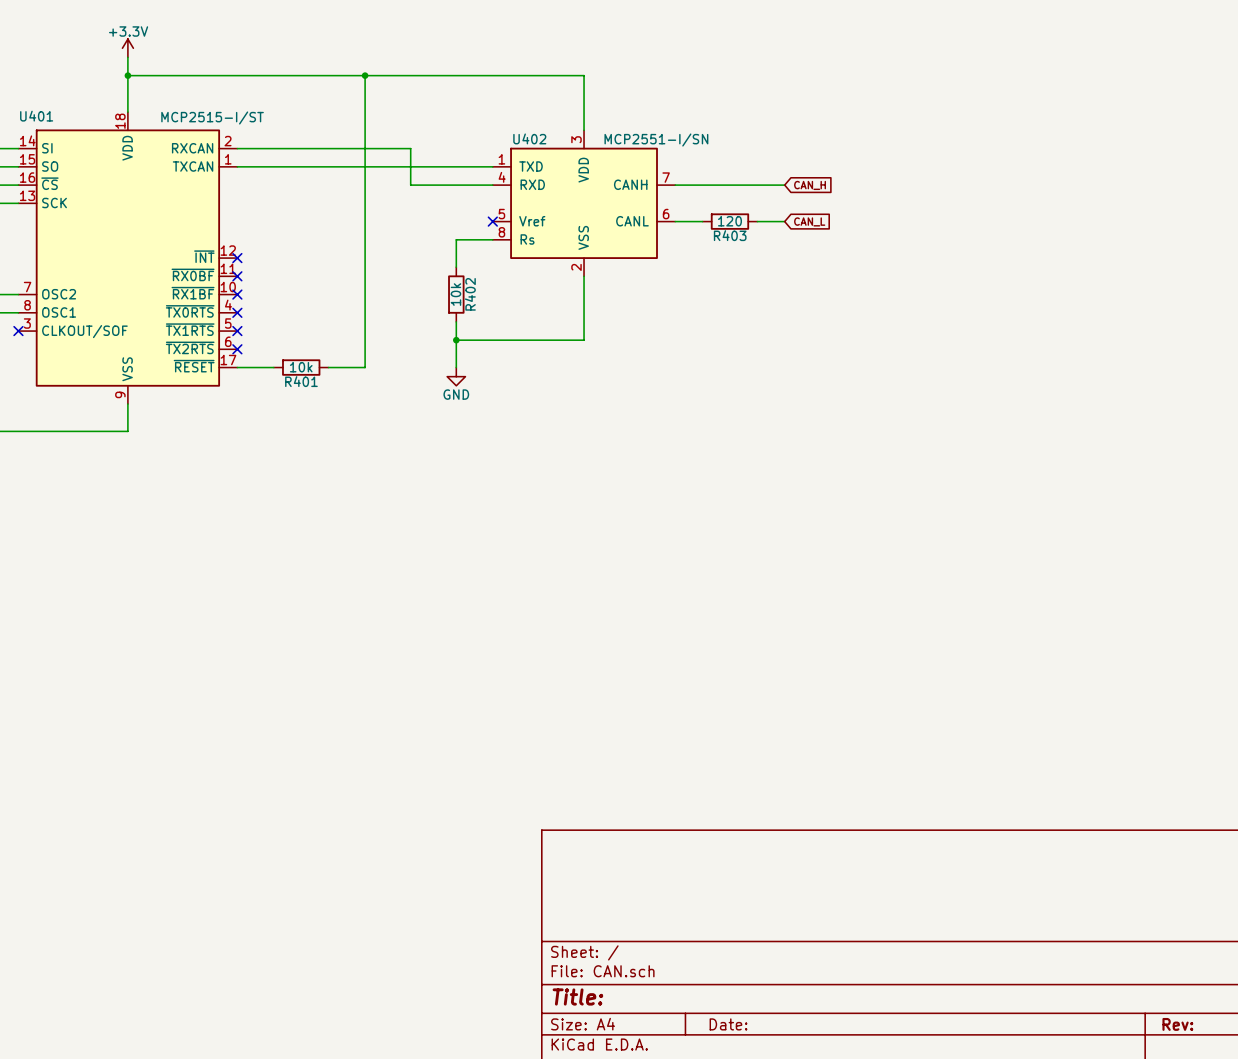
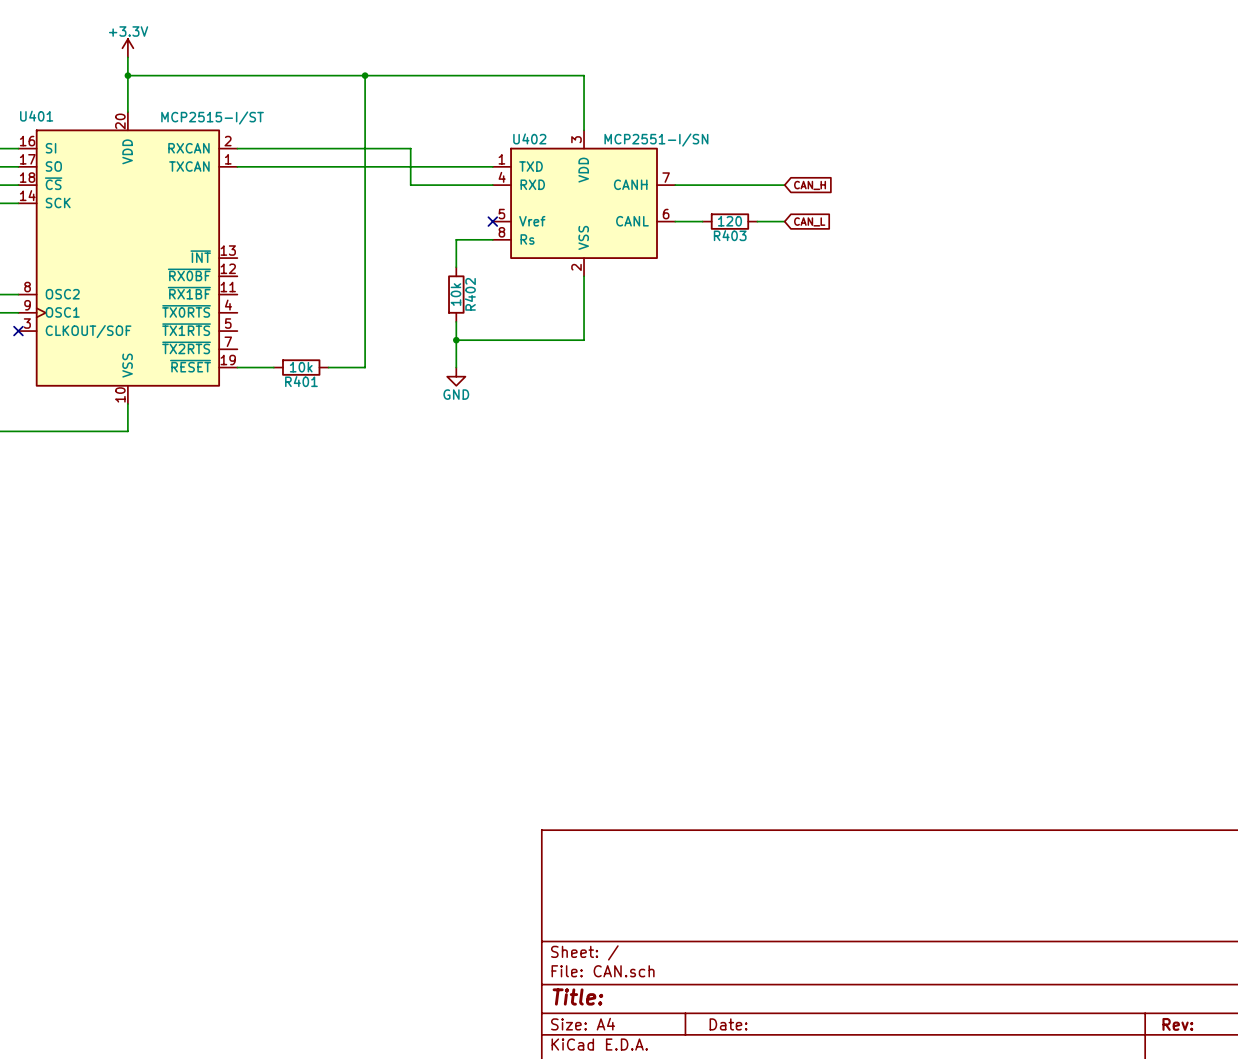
U401 symbol: [18, 112, 238, 405] -> [18, 112, 238, 405]
no-connect mark: (237, 258) -> none
no-connect mark: (237, 276) -> none
no-connect mark: (237, 294) -> none
no-connect mark: (237, 312) -> none
no-connect mark: (237, 331) -> none
no-connect mark: (237, 349) -> none

